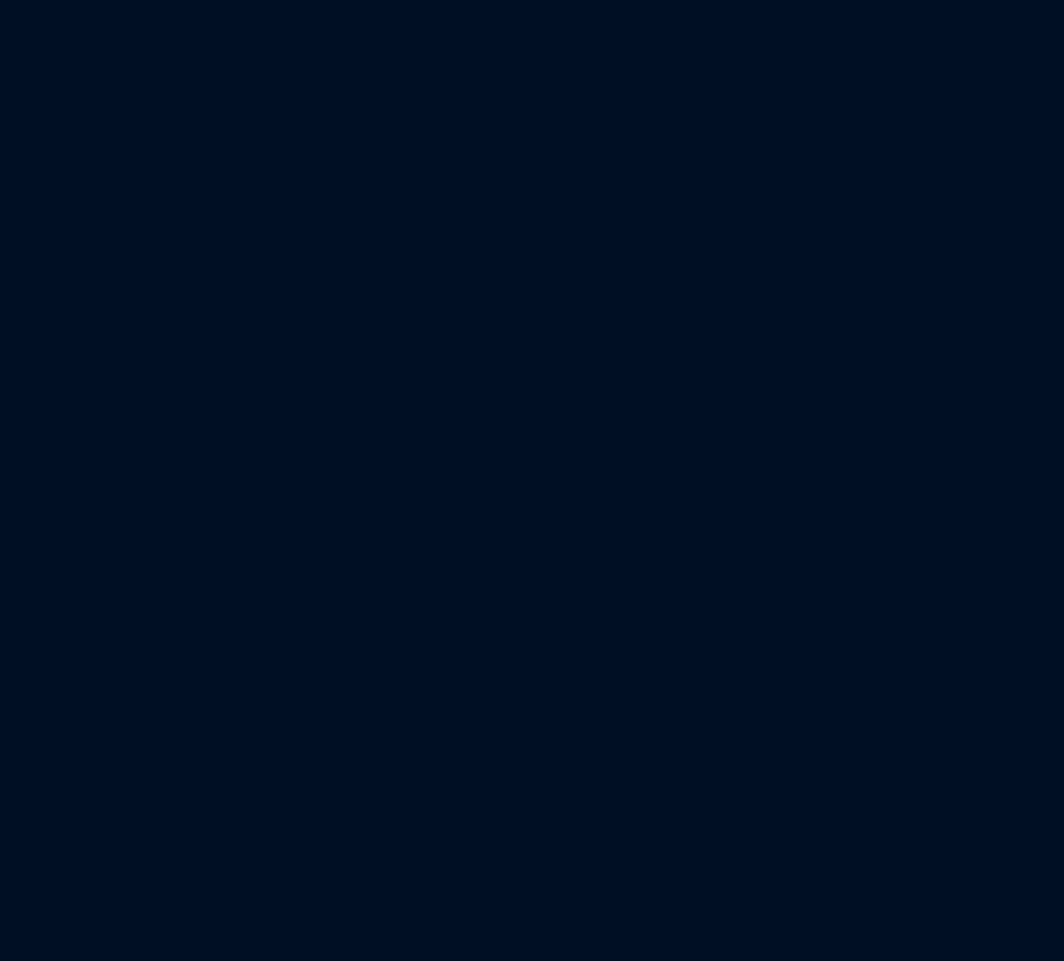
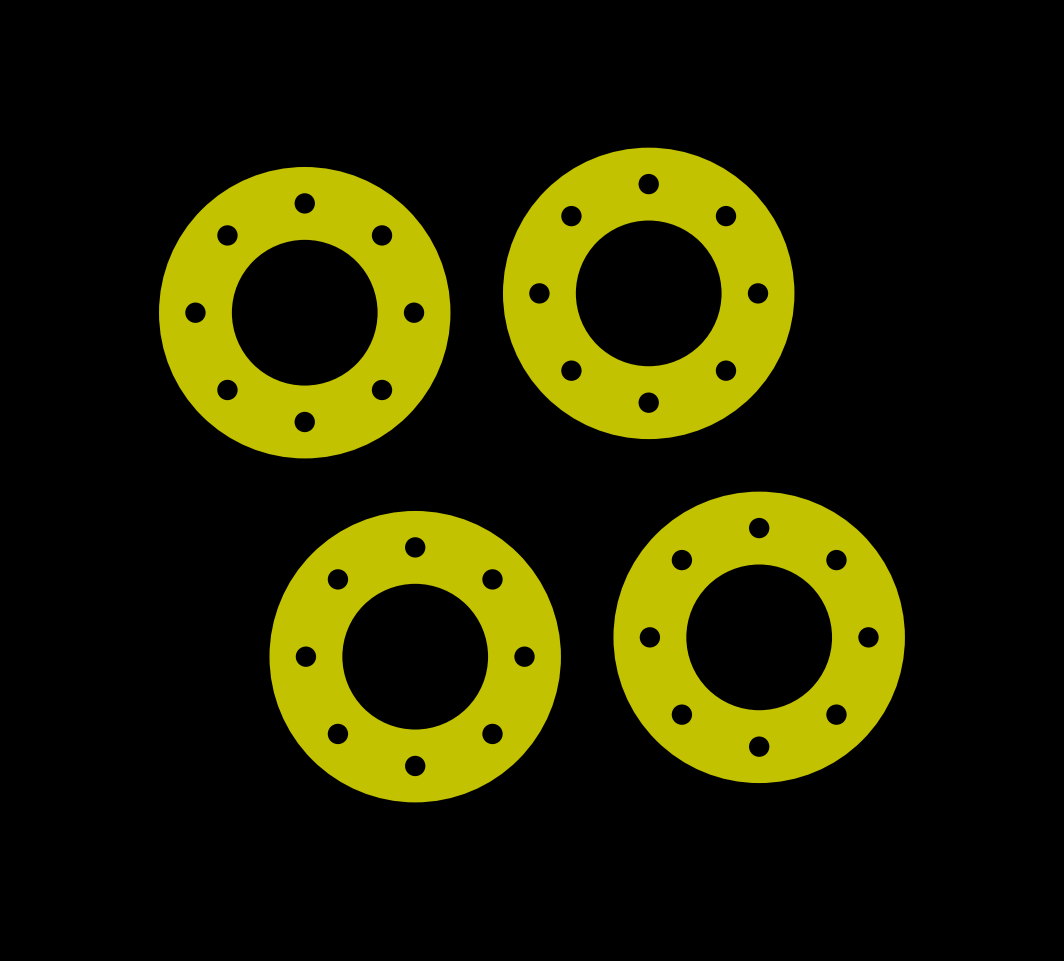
part: none -> (648, 293)
part: none -> (304, 312)
part: none -> (759, 637)
part: none -> (415, 656)

